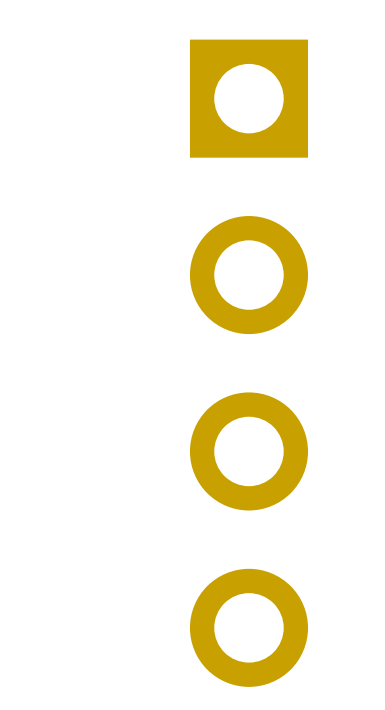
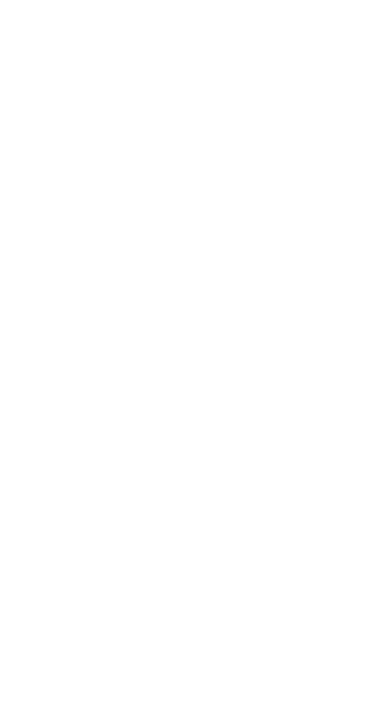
part: (248, 363) -> none

